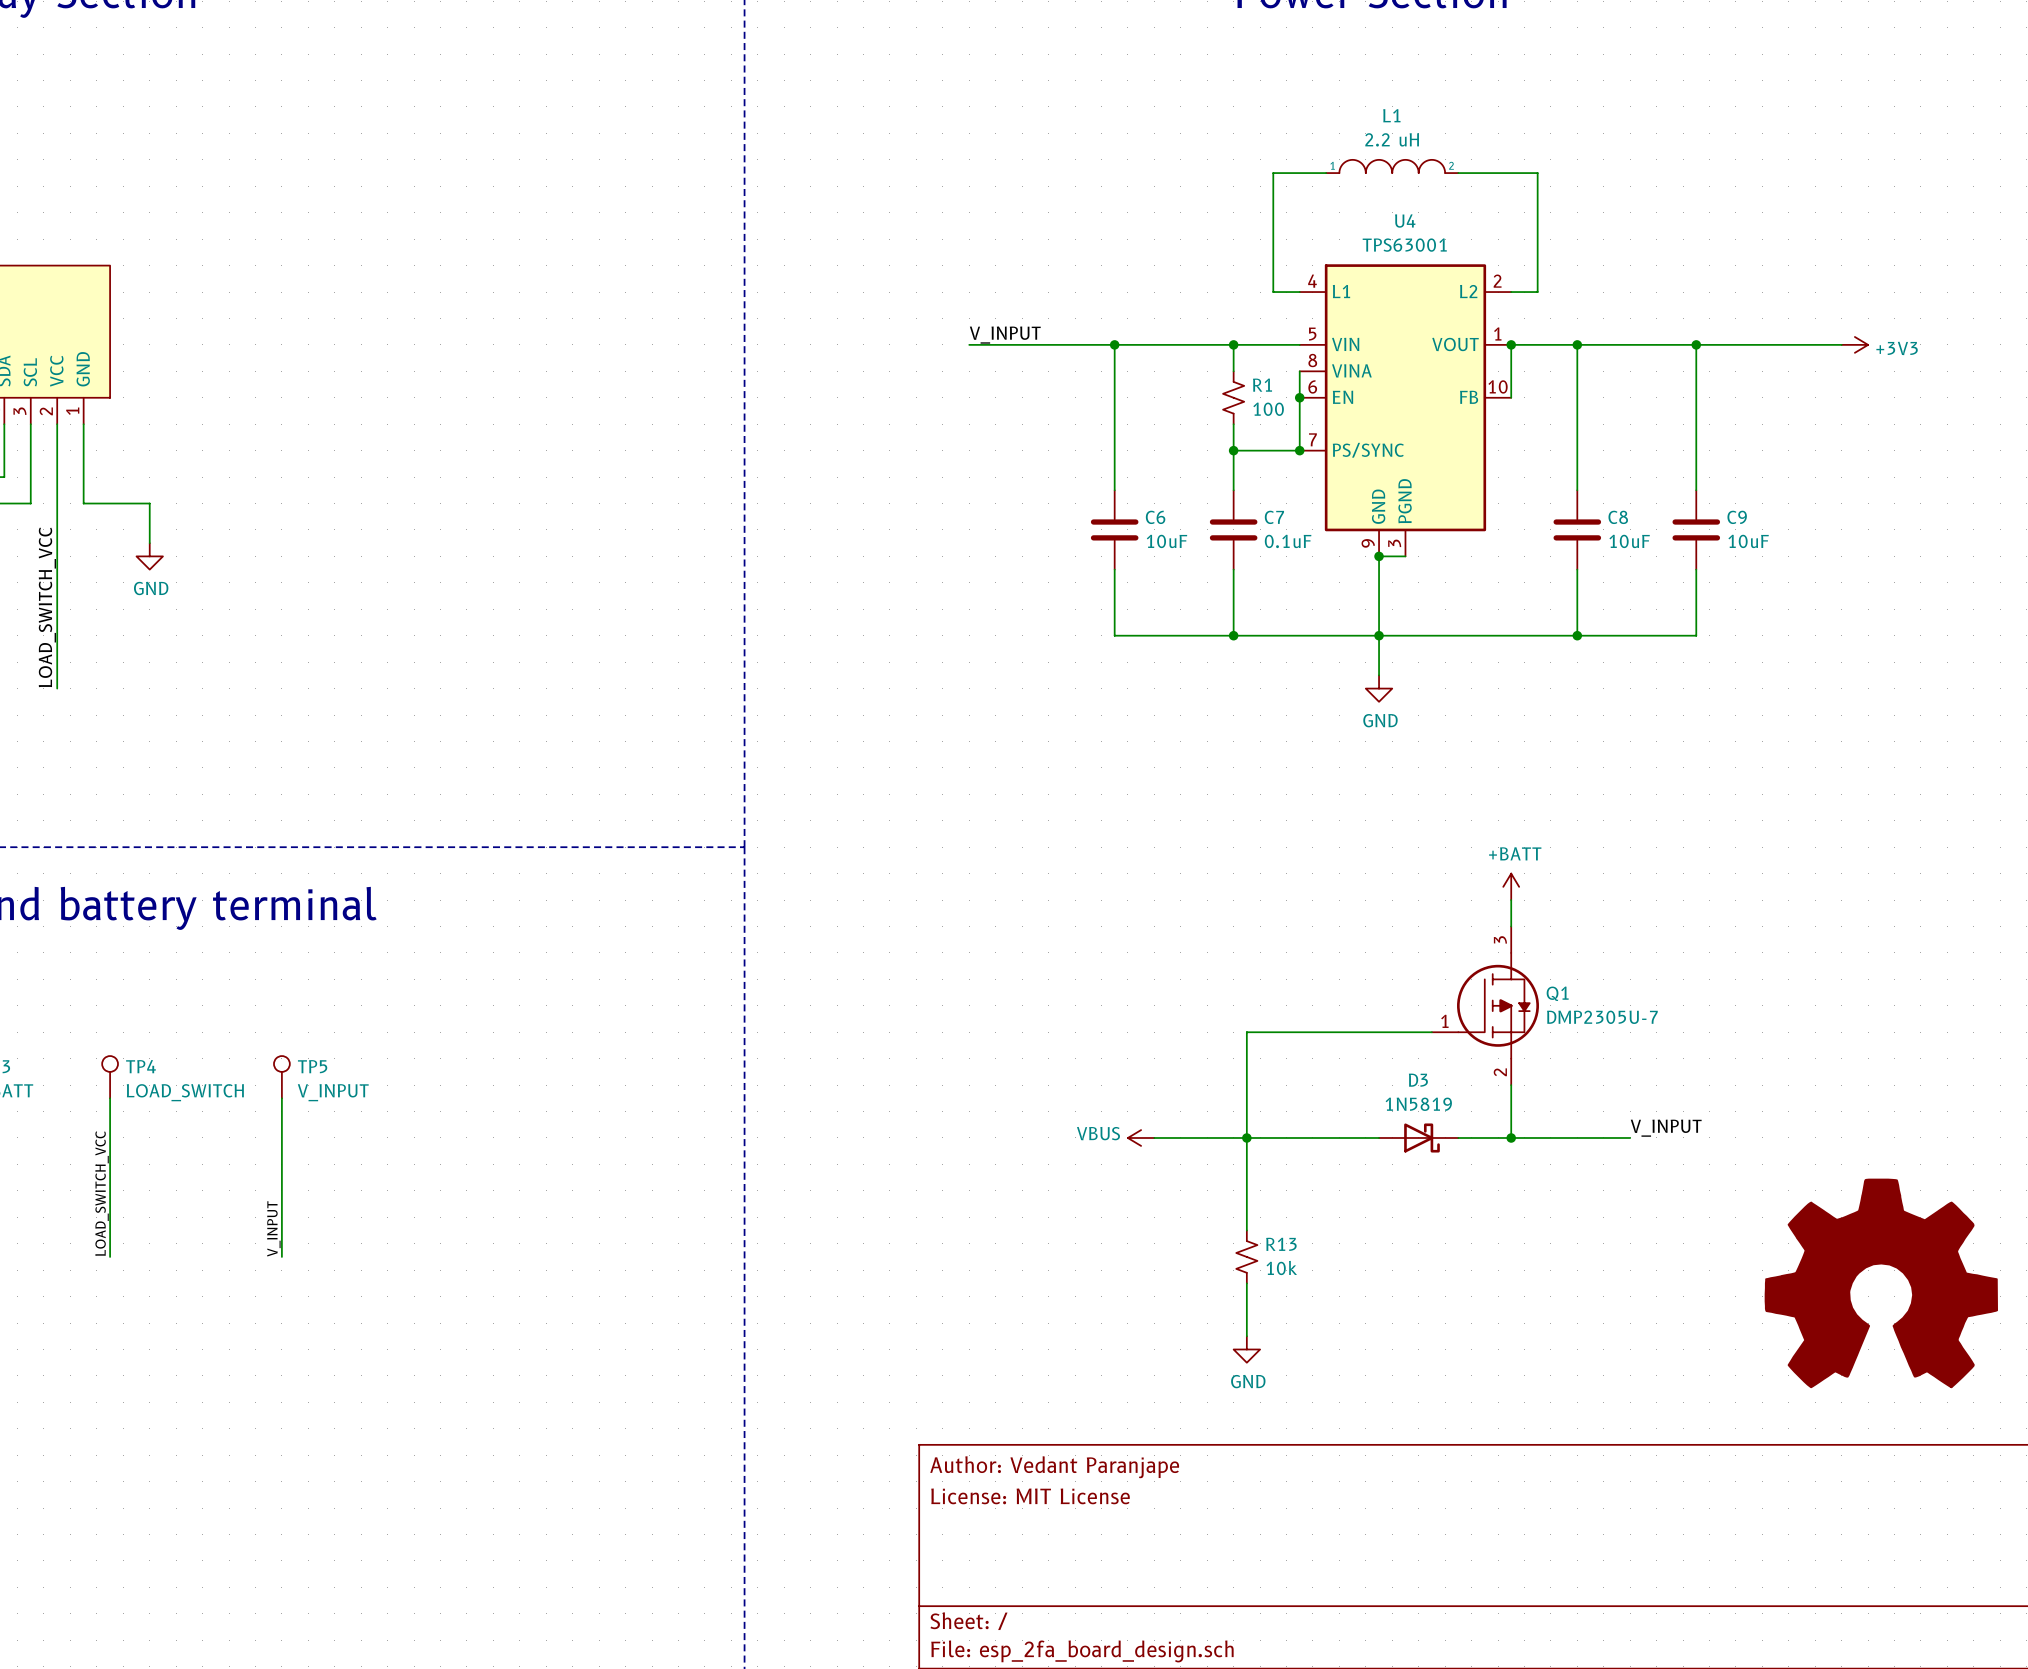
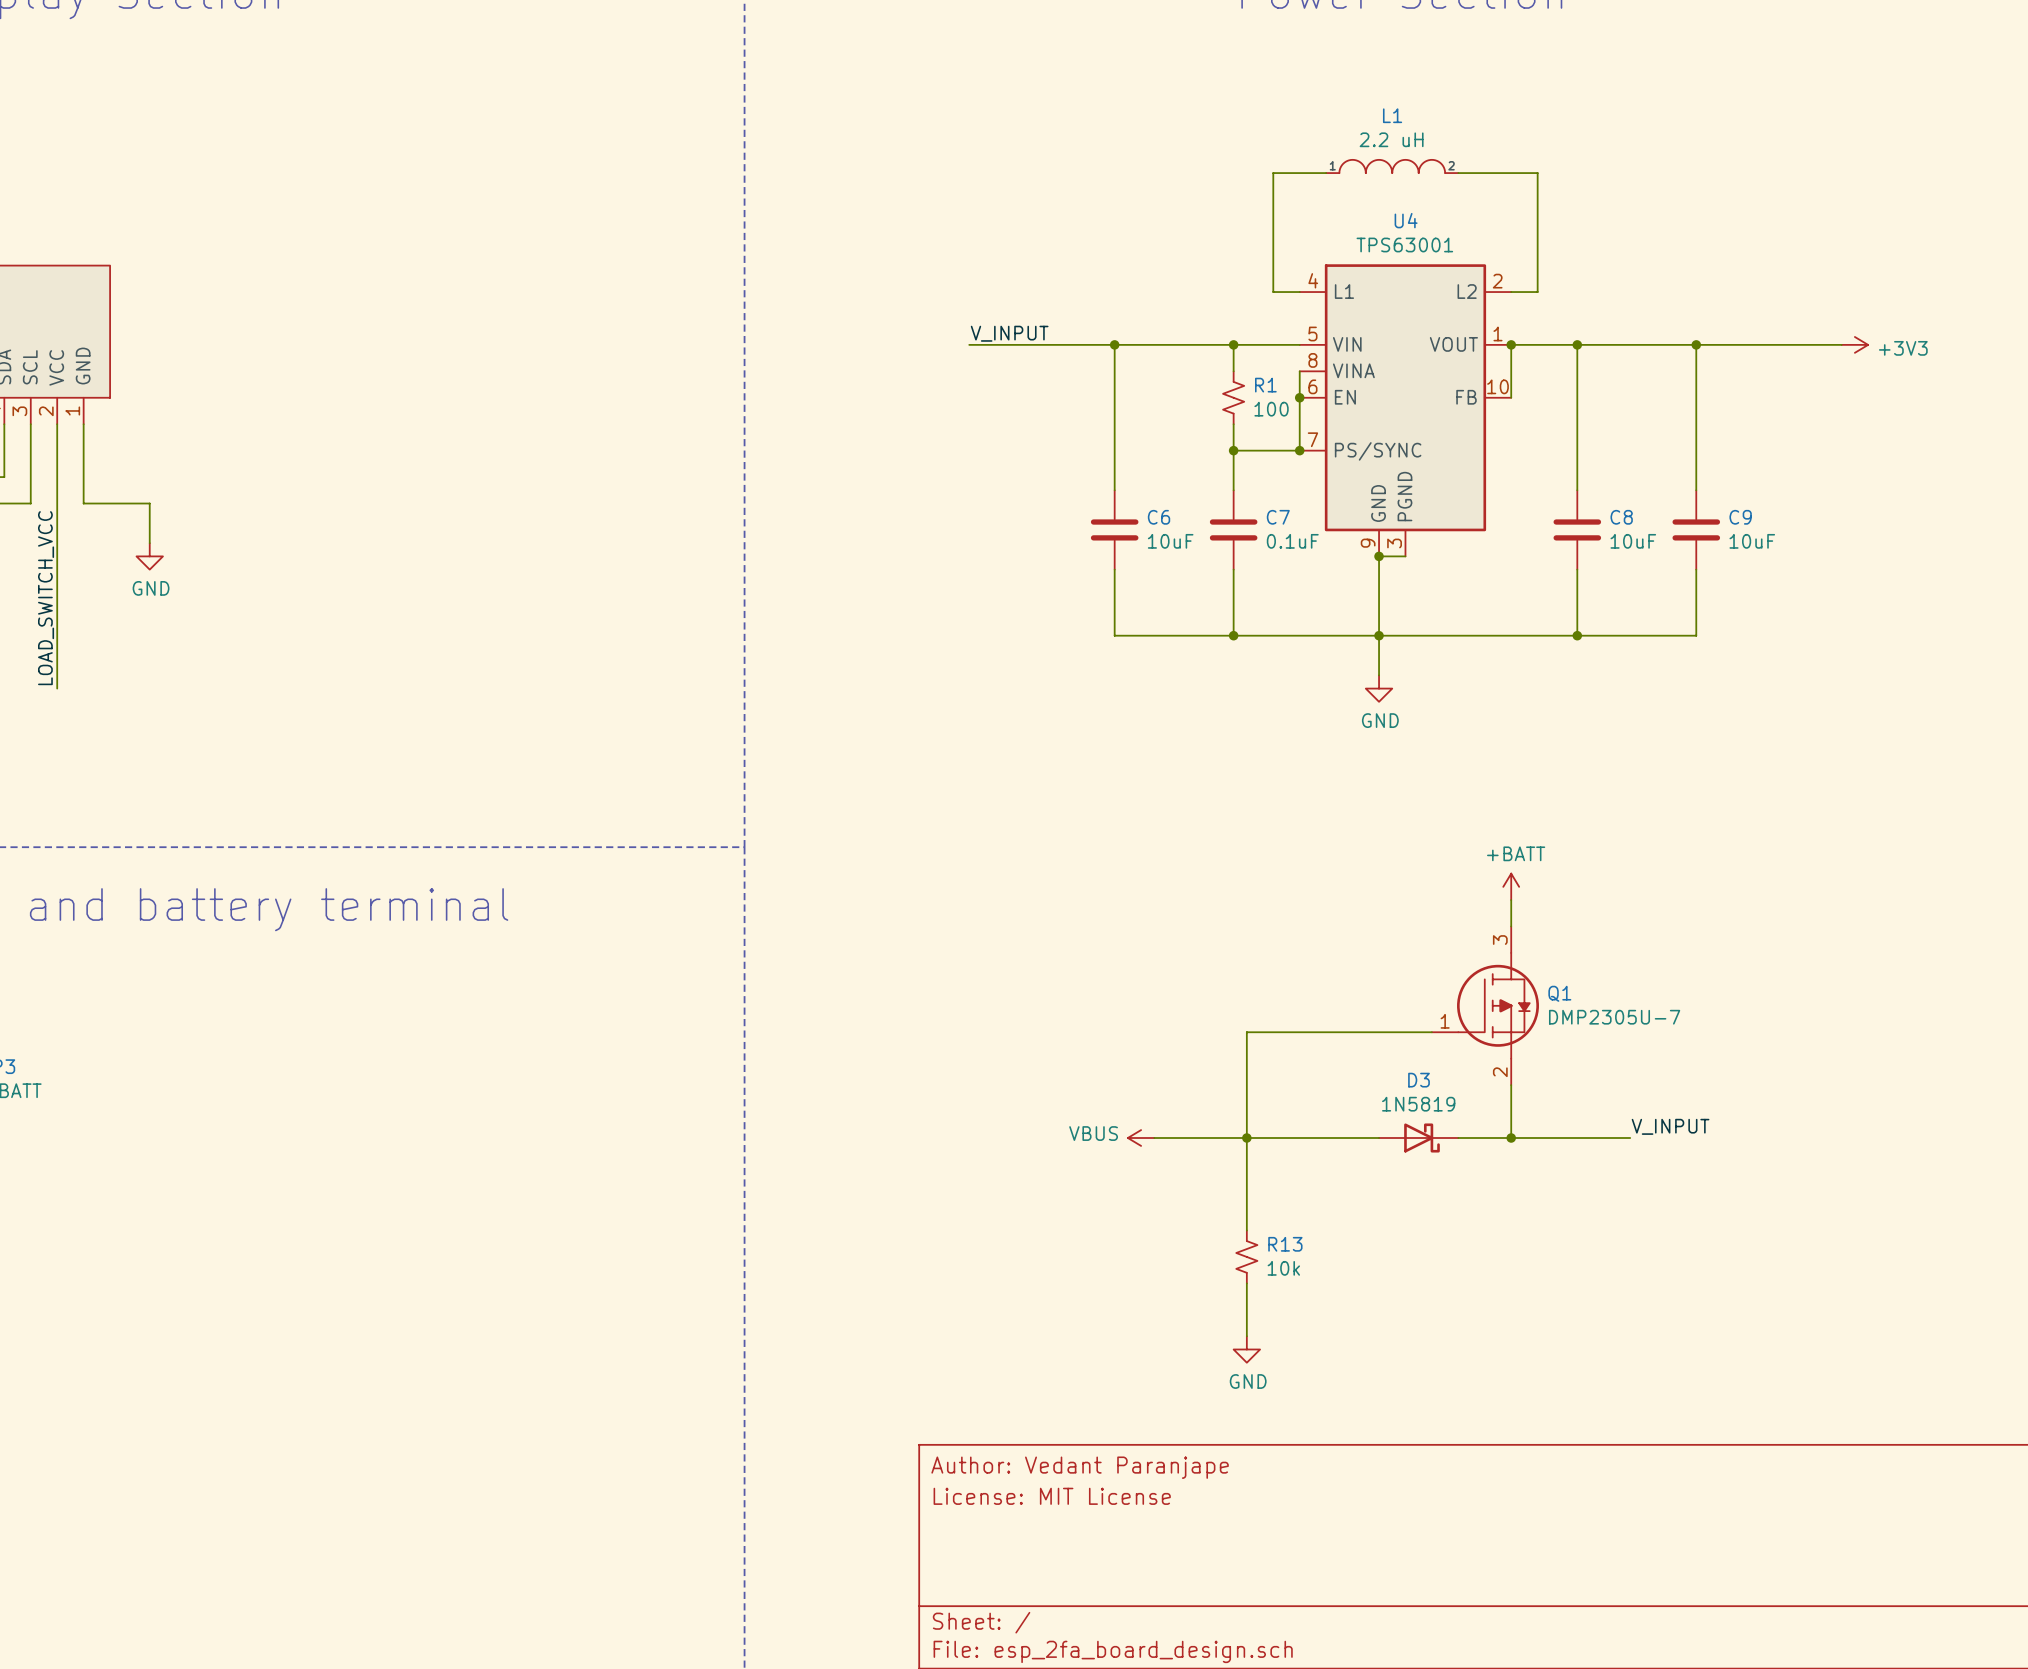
TP4: LOAD_SWITCH (110, 1077) -> none
TP5: V_INPUT (281, 1077) -> none
wire: (110, 1098) (110, 1256) -> none
wire: (281, 1098) (281, 1256) -> none
label: LOAD_SWITCH_VCC (102, 1193) -> none
label: V_INPUT (273, 1228) -> none
power symbol: (1881, 1283) -> none

